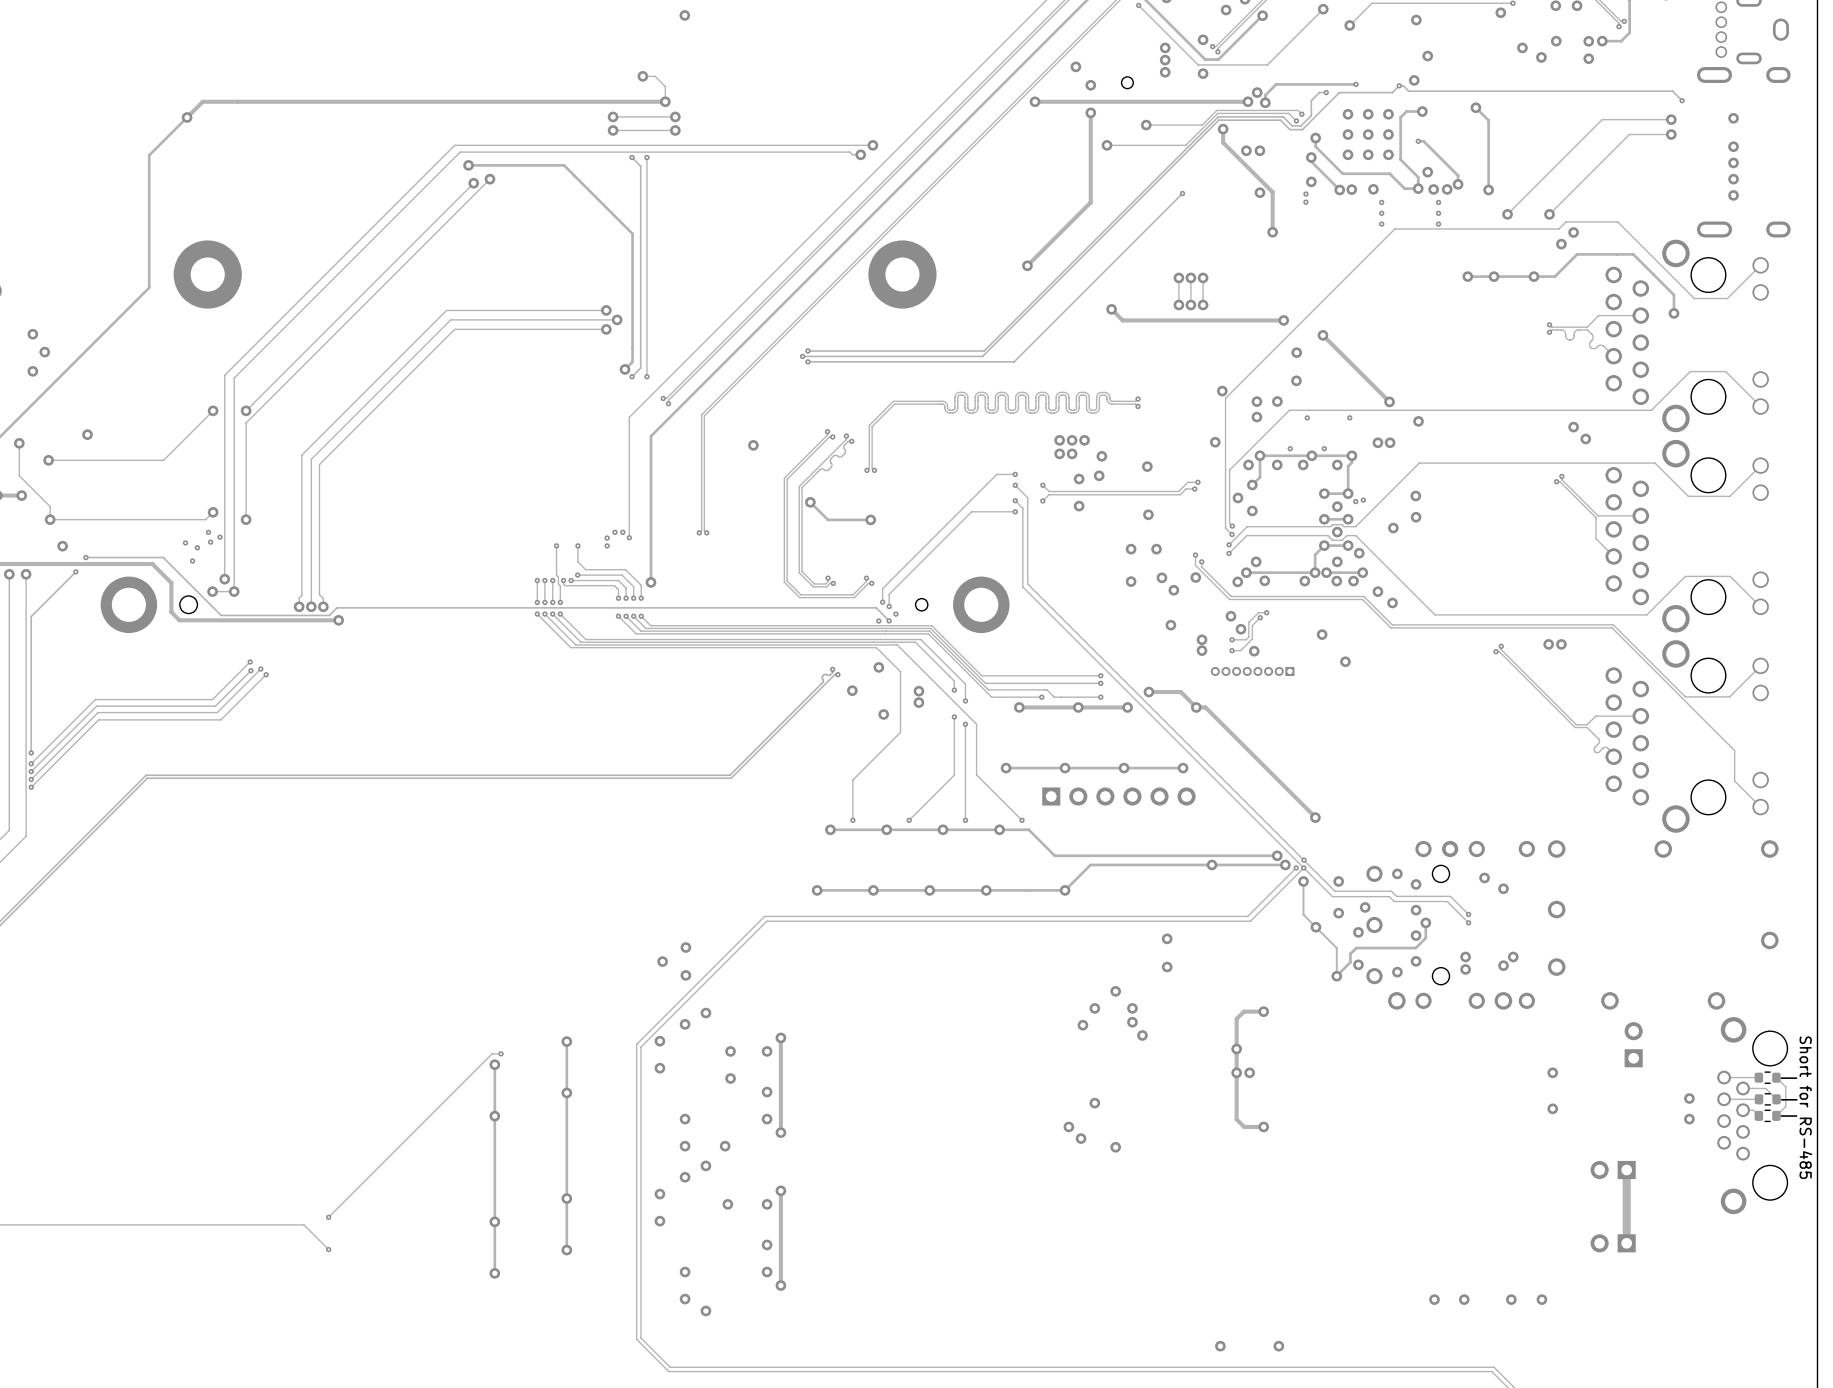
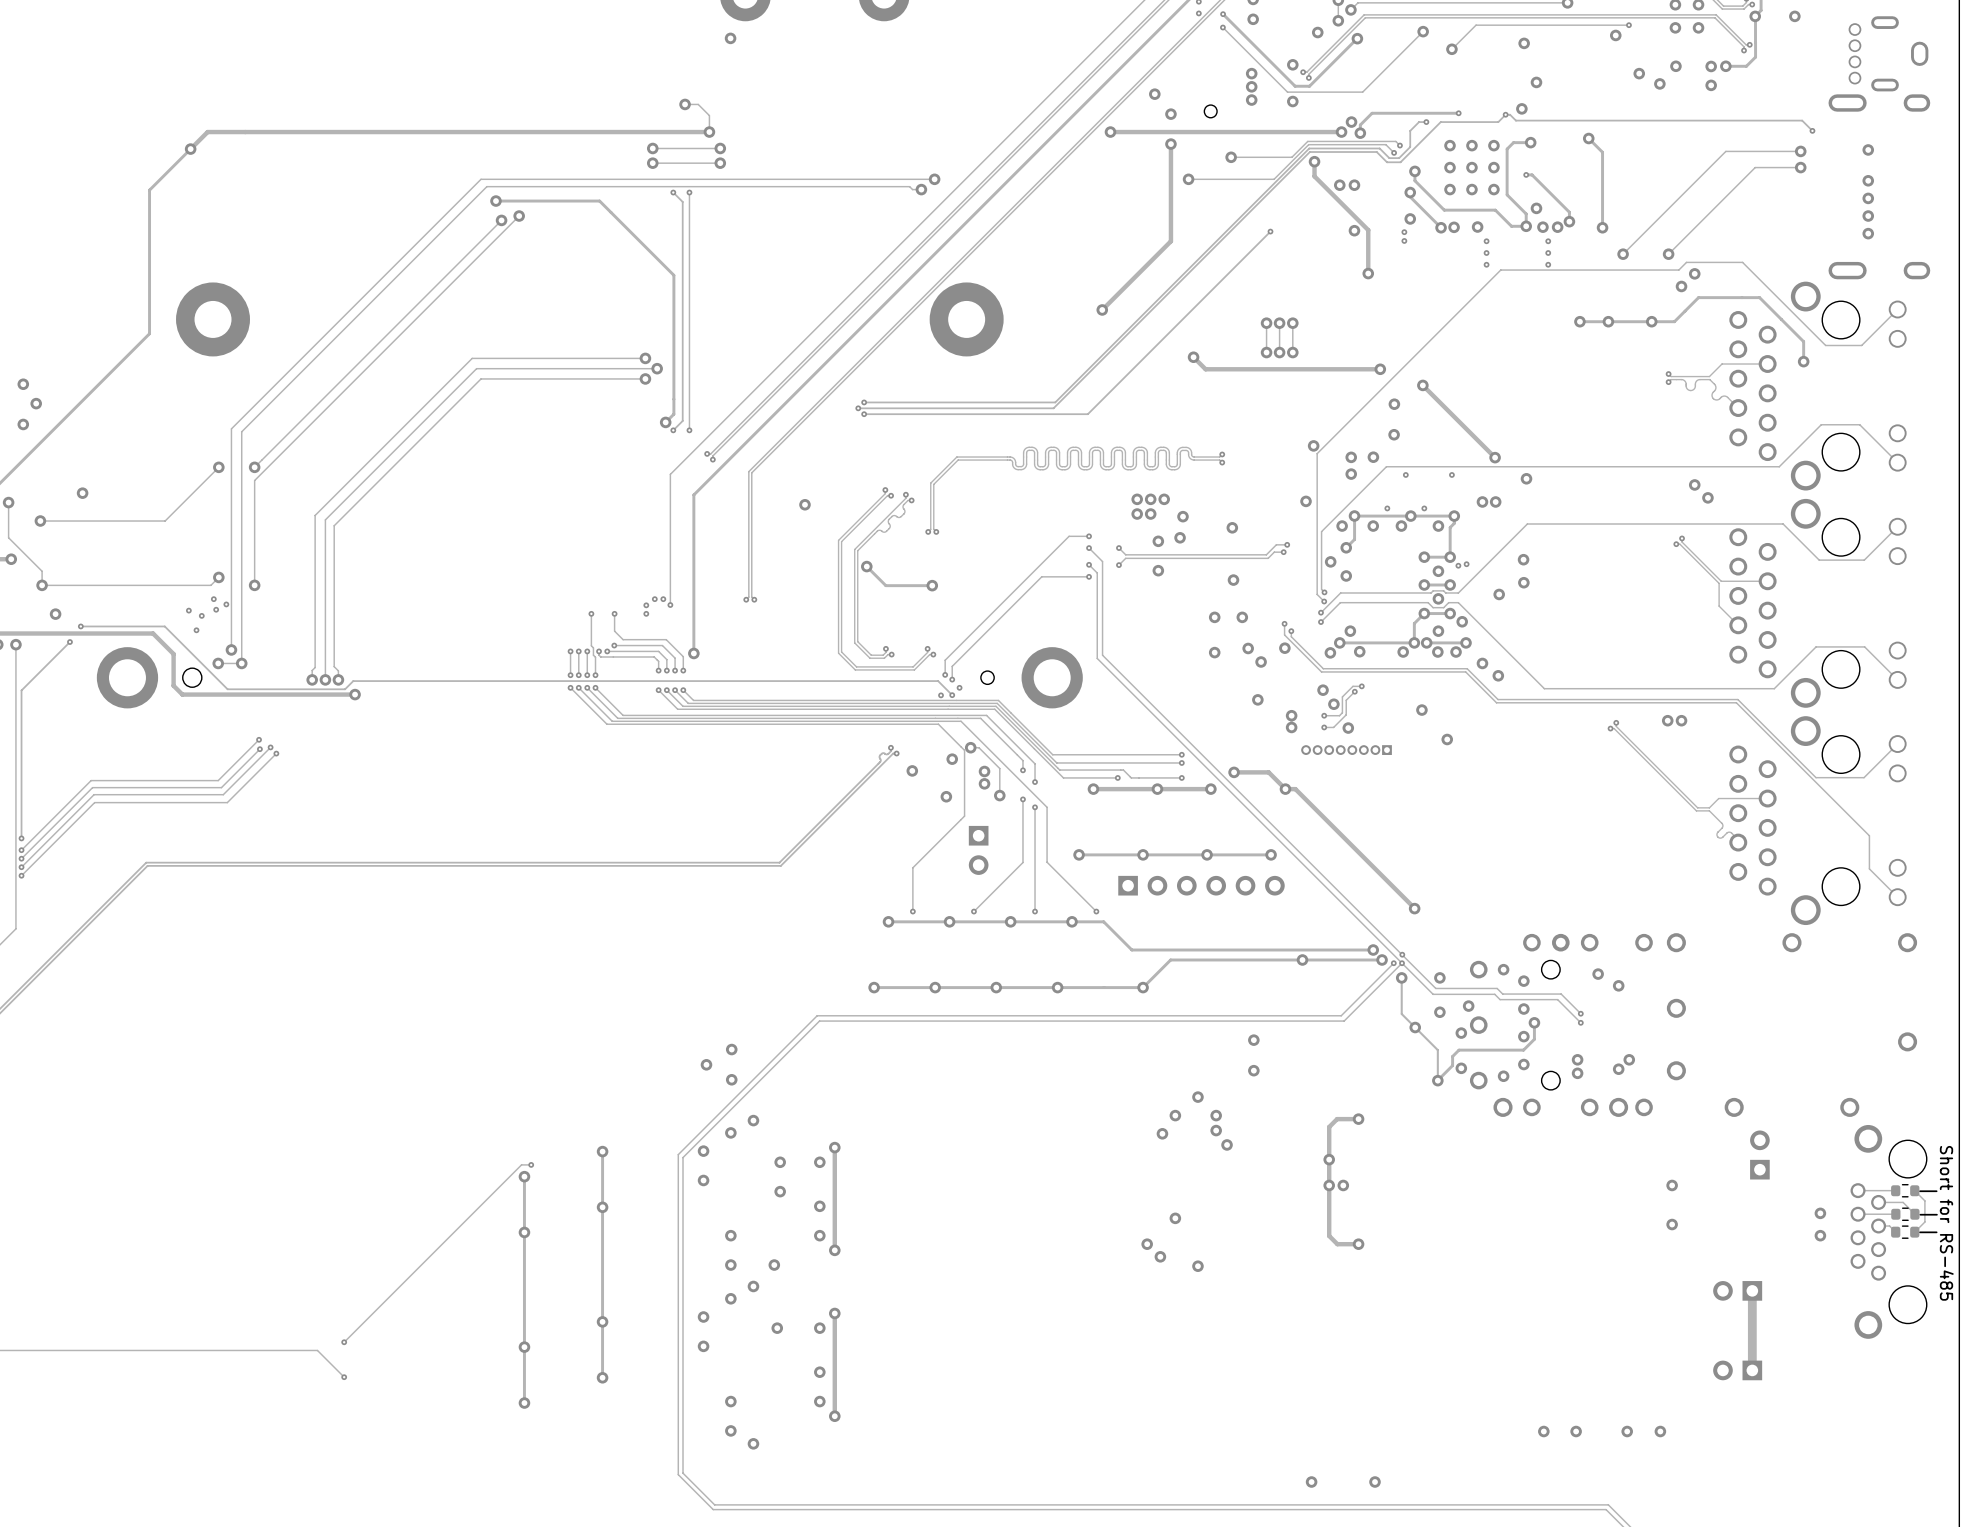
via: (878, 667) -> none
track: none -> (970, 747) (978, 747) (999, 768) (999, 795)
via: none -> (970, 747)
via: none -> (952, 759)
via: none -> (999, 795)
part: none -> (978, 850)

